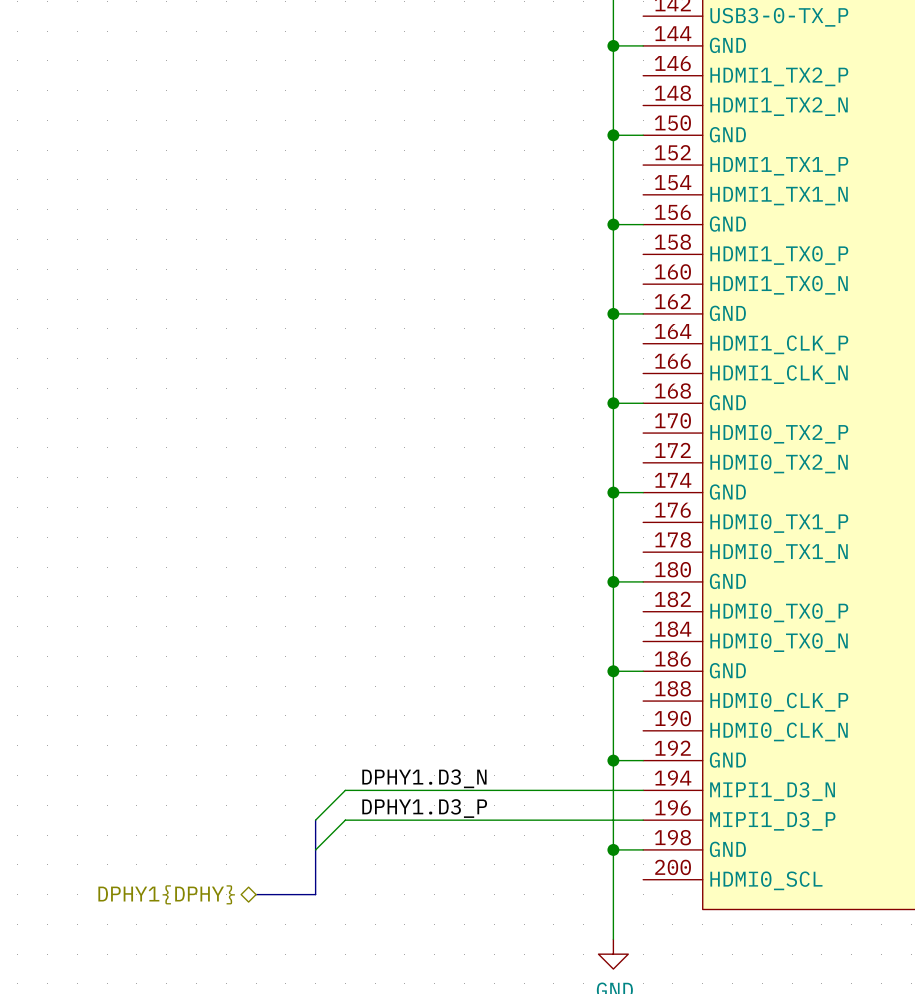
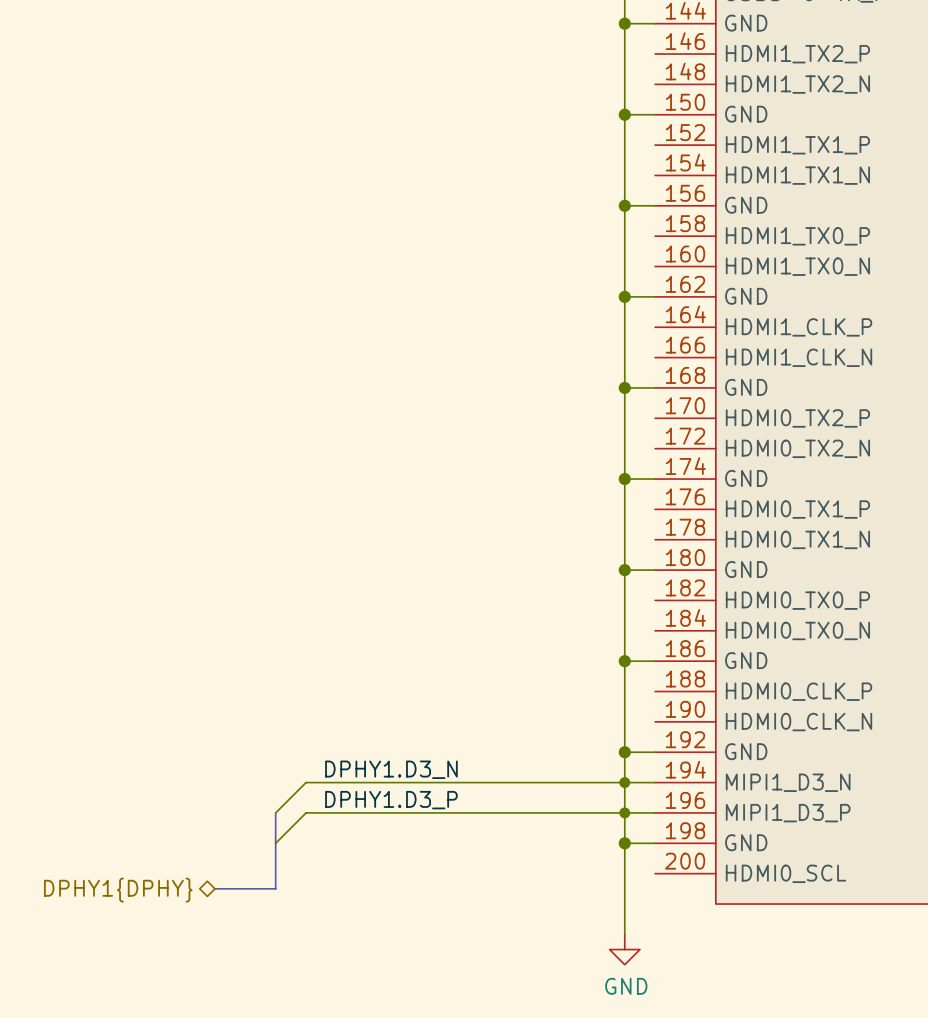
label position: DPHY1.D3_N (424, 778) -> DPHY1.D3_N (391, 769)
wire: (345, 790) (315, 820) -> (351, 782) (306, 782) (275, 812)
junction: none -> (624, 782)
label position: DPHY1.D3_P (424, 808) -> DPHY1.D3_P (391, 800)
bus: (315, 820) (315, 894) (270, 894) -> (275, 812) (275, 888)
wire: (345, 820) (315, 849) -> (351, 812) (306, 812) (275, 843)
junction: none -> (624, 812)
hierarchical label position: DPHY1{DPHY} (166, 894) -> DPHY1{DPHY} (118, 890)
bus: none -> (214, 888) (260, 888)

